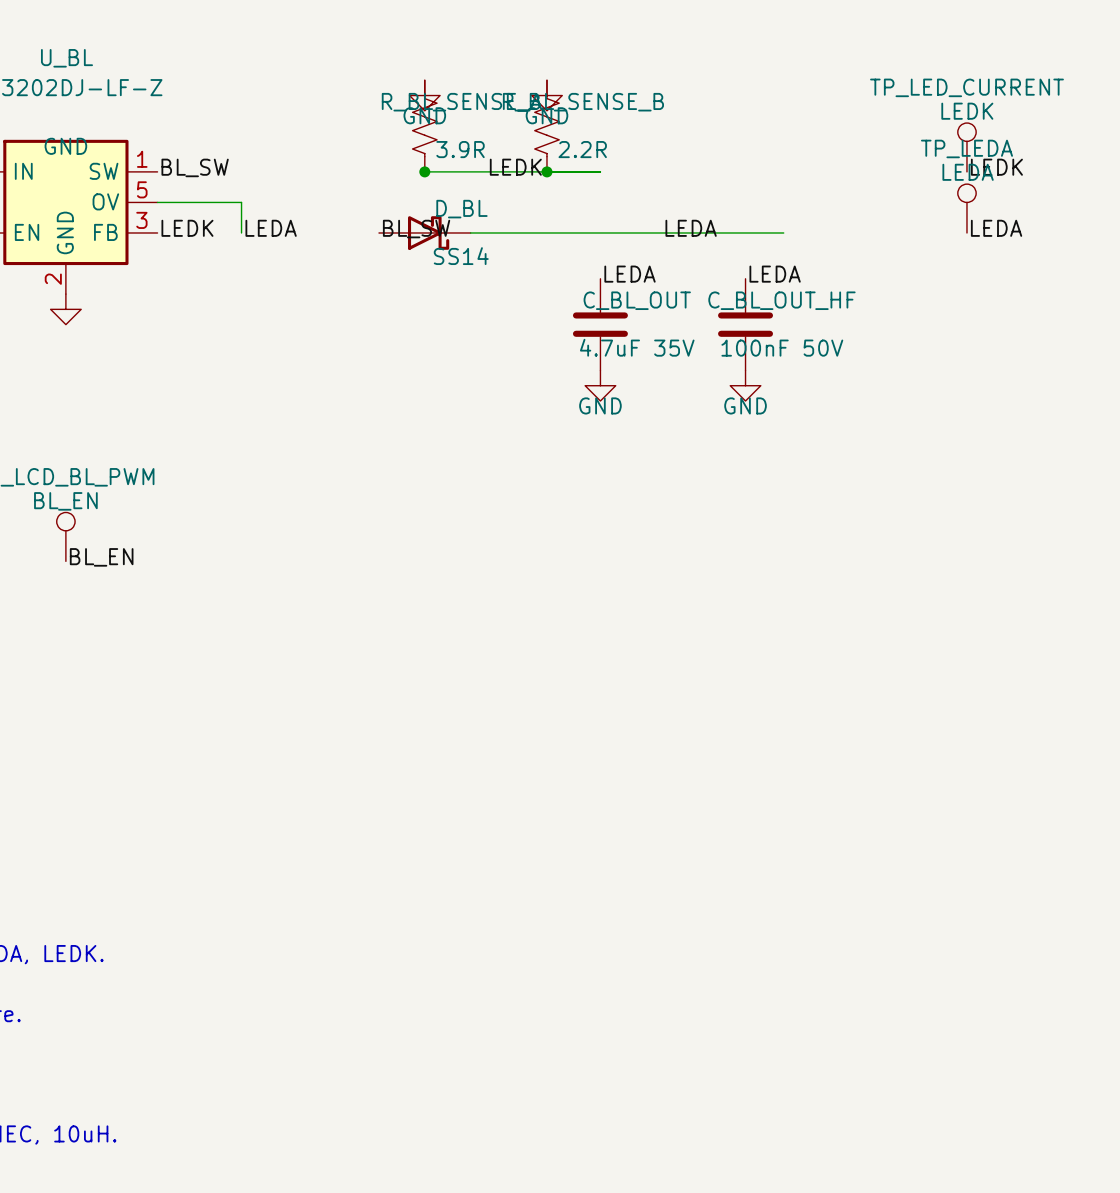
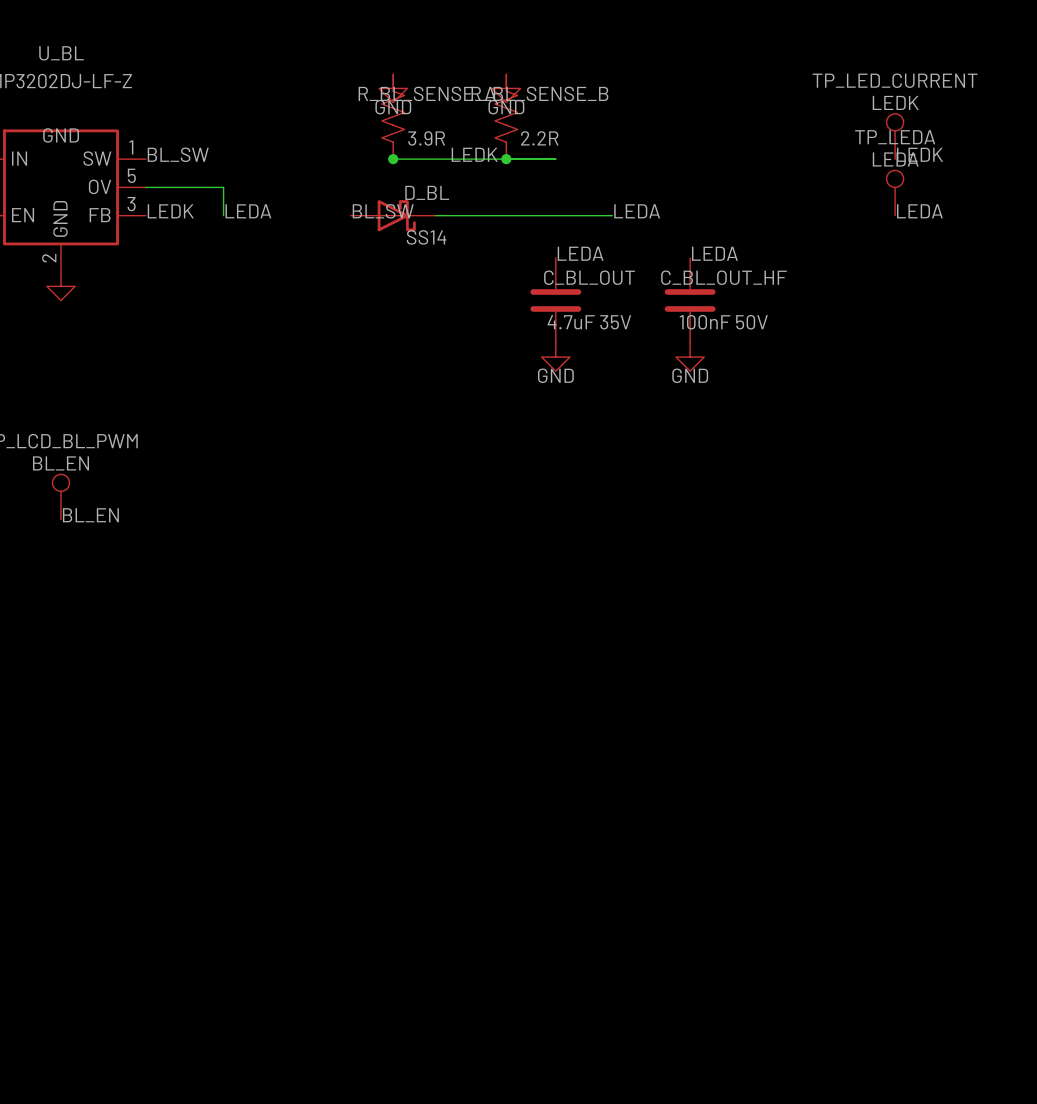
wire: (661, 232) (783, 232) -> none

